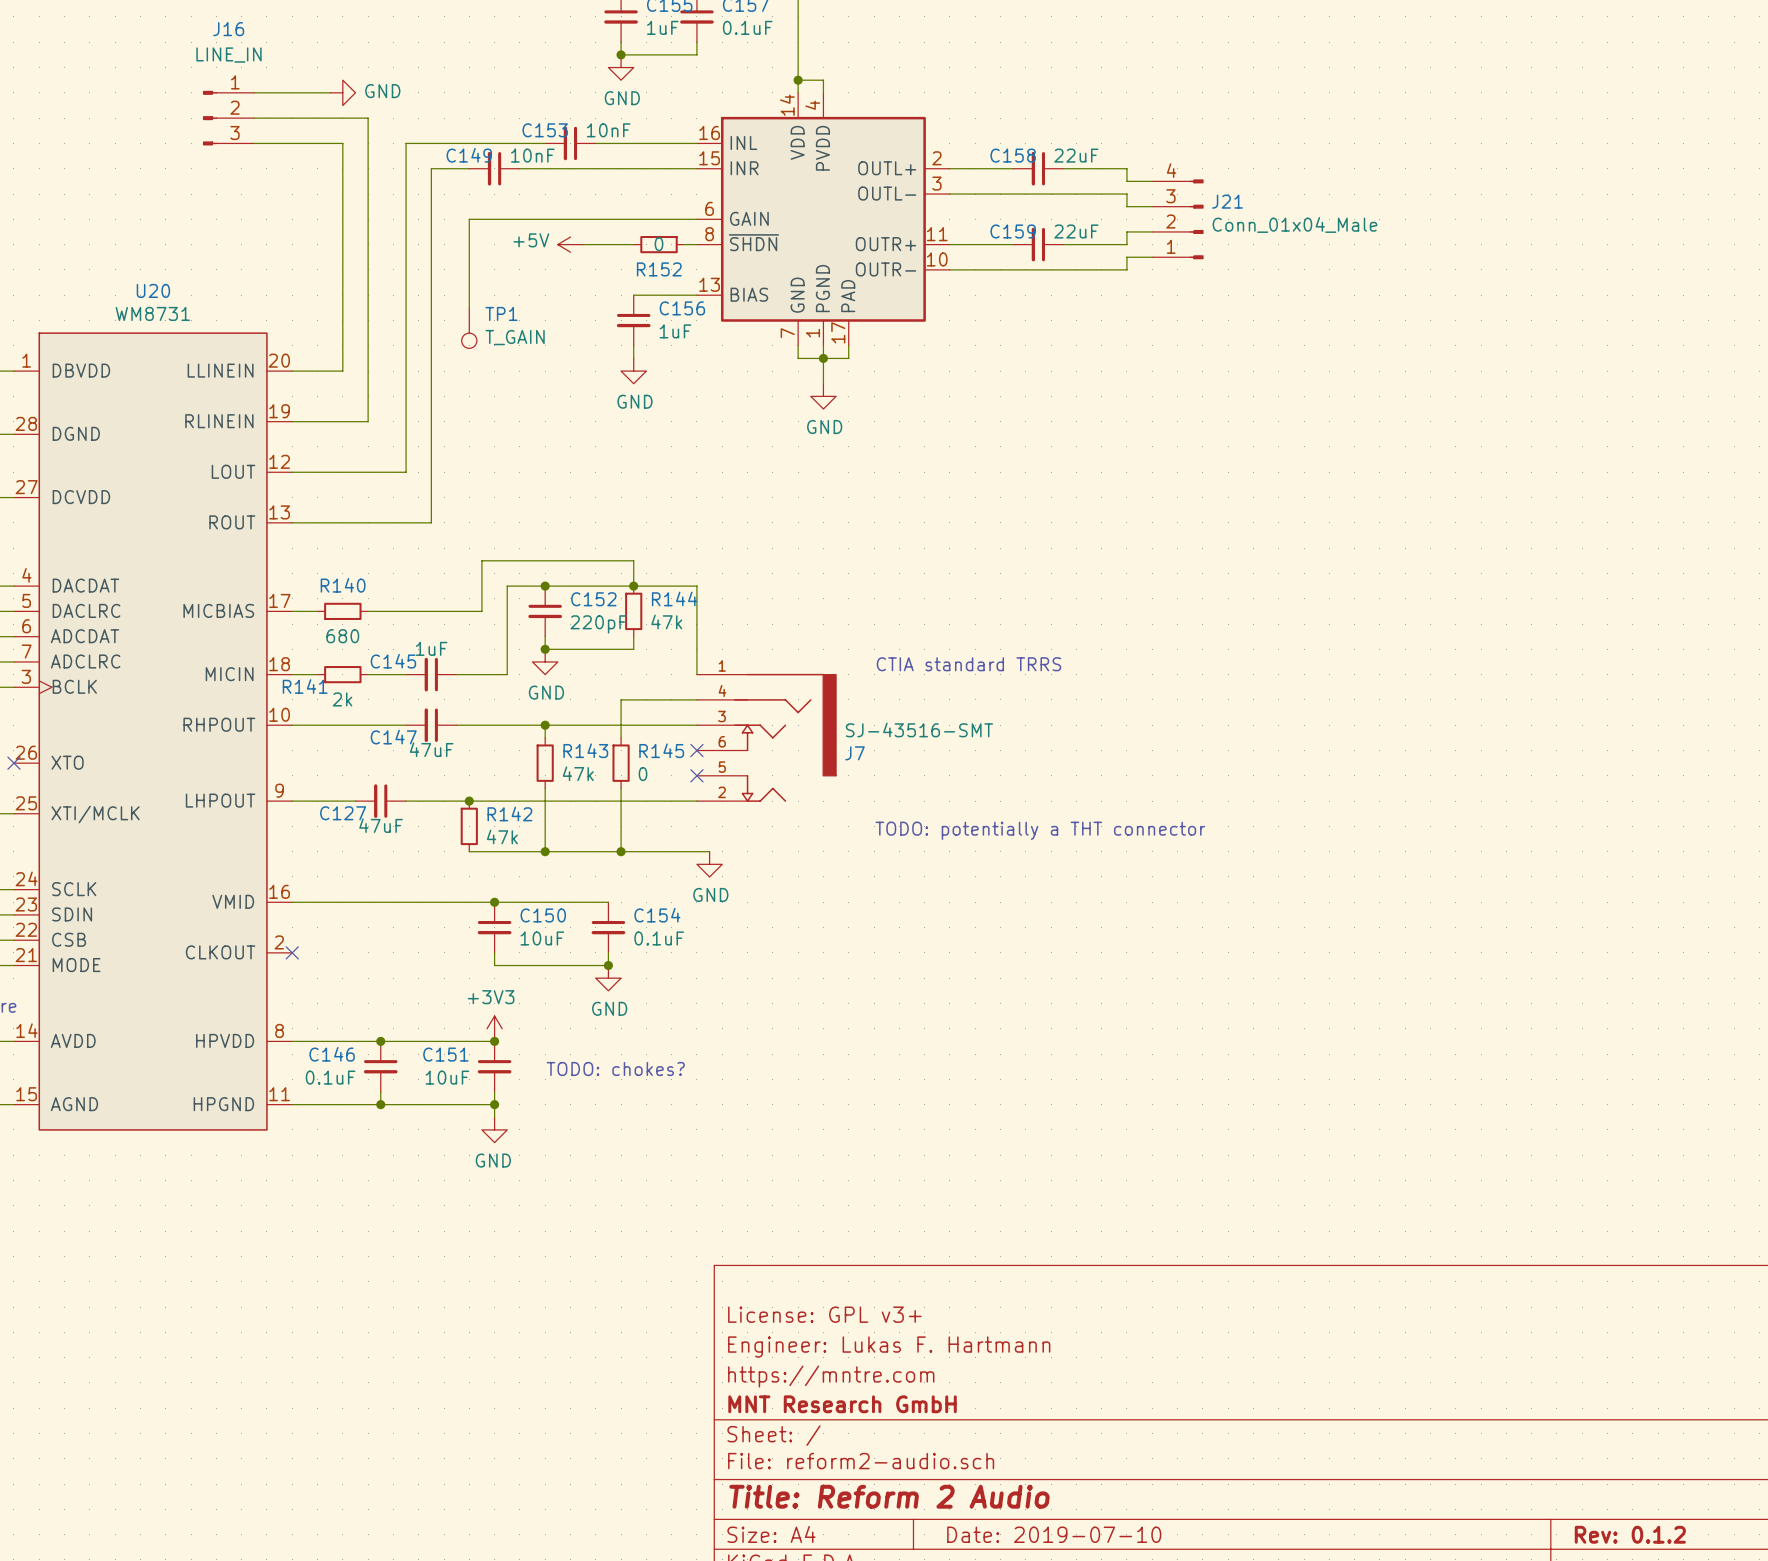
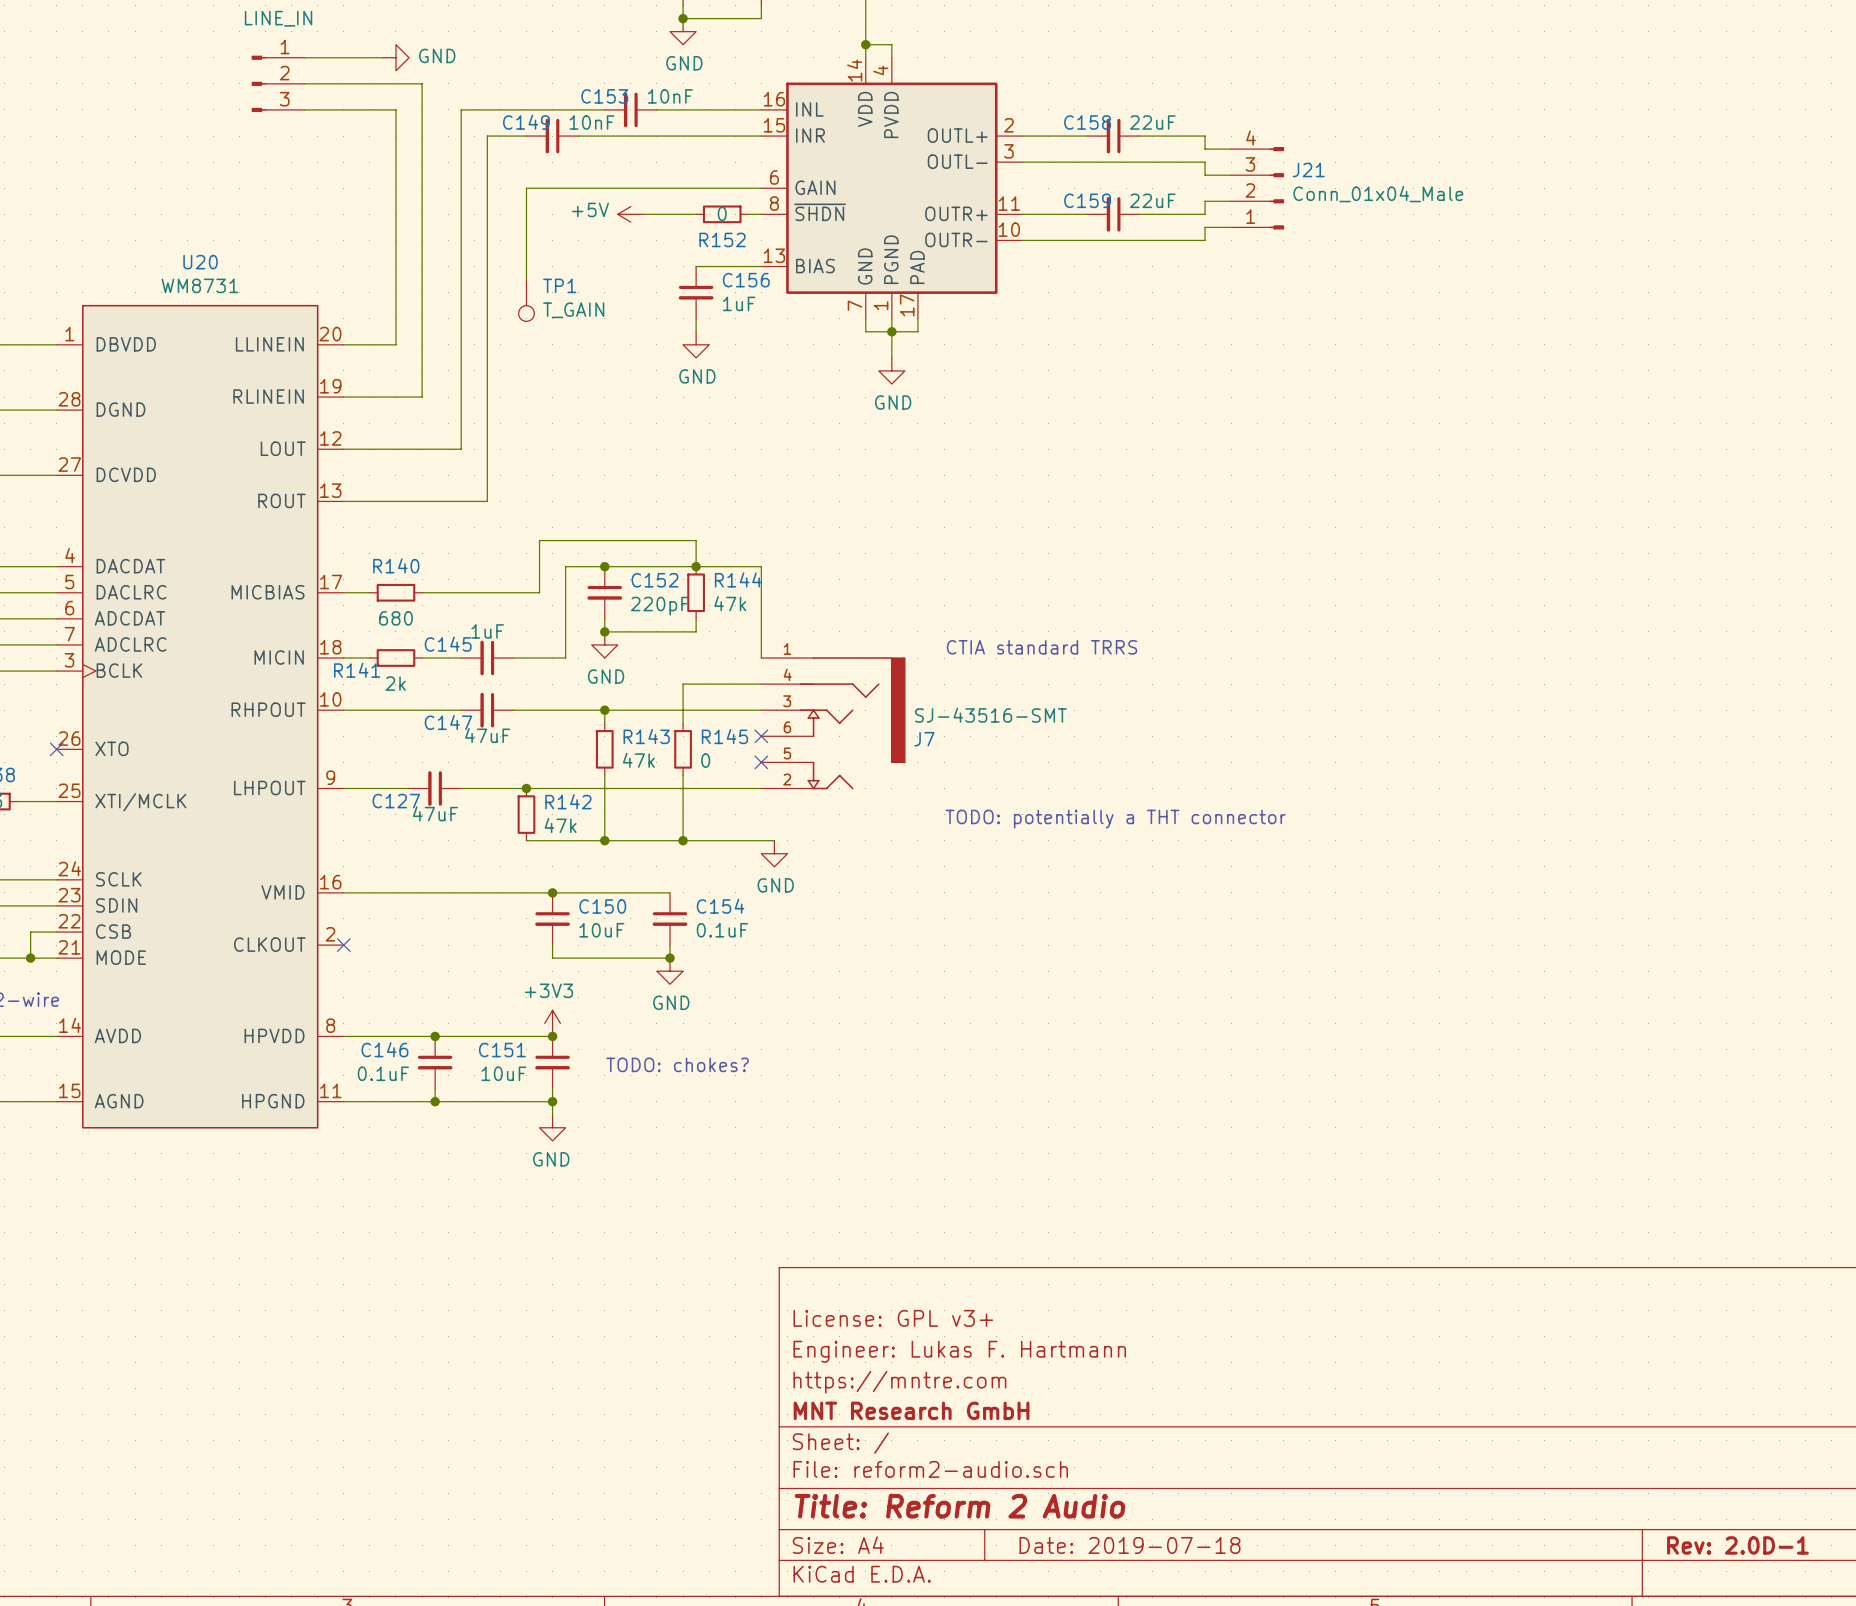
title block: Date: 2019-07-10 (1054, 1534) -> Date: 2019-07-18 (1130, 1545)
title block: Rev: 0.1.2 (1630, 1534) -> Rev: 2.0D-1 (1737, 1545)

